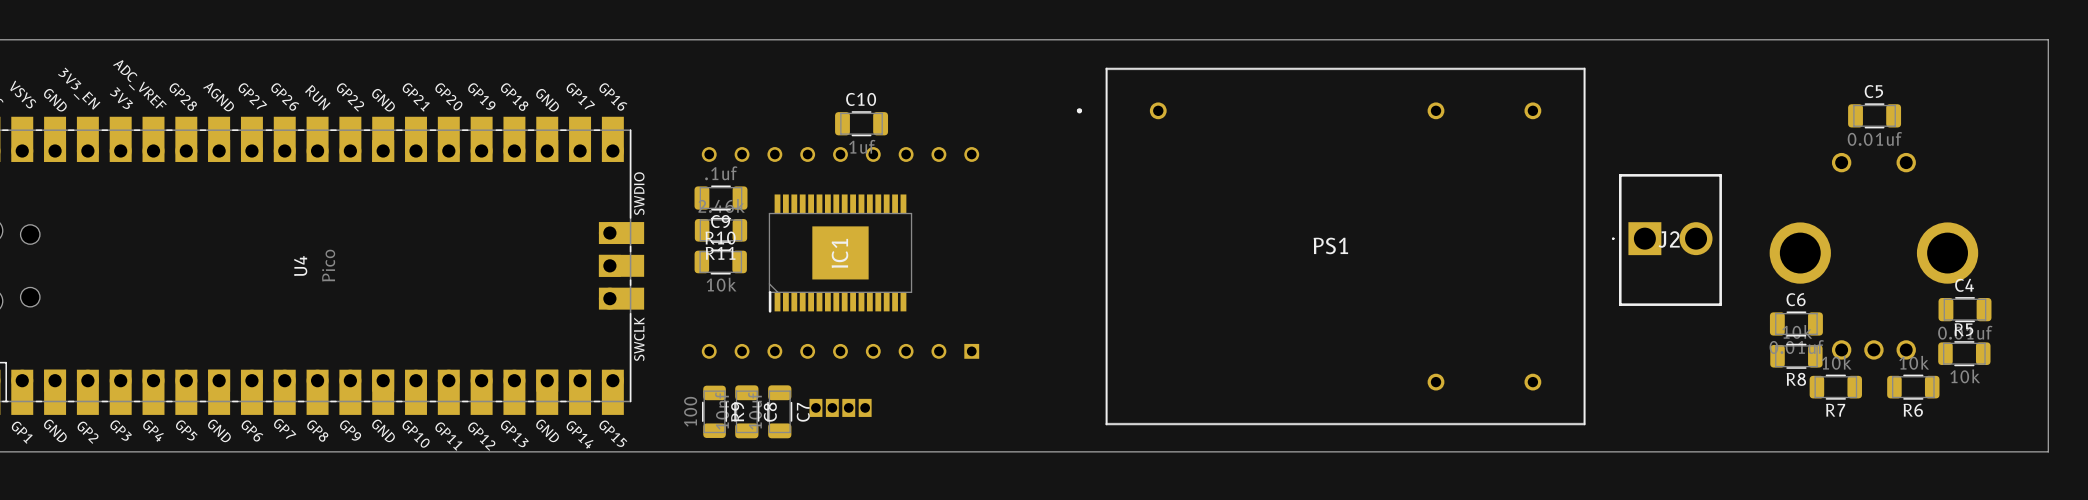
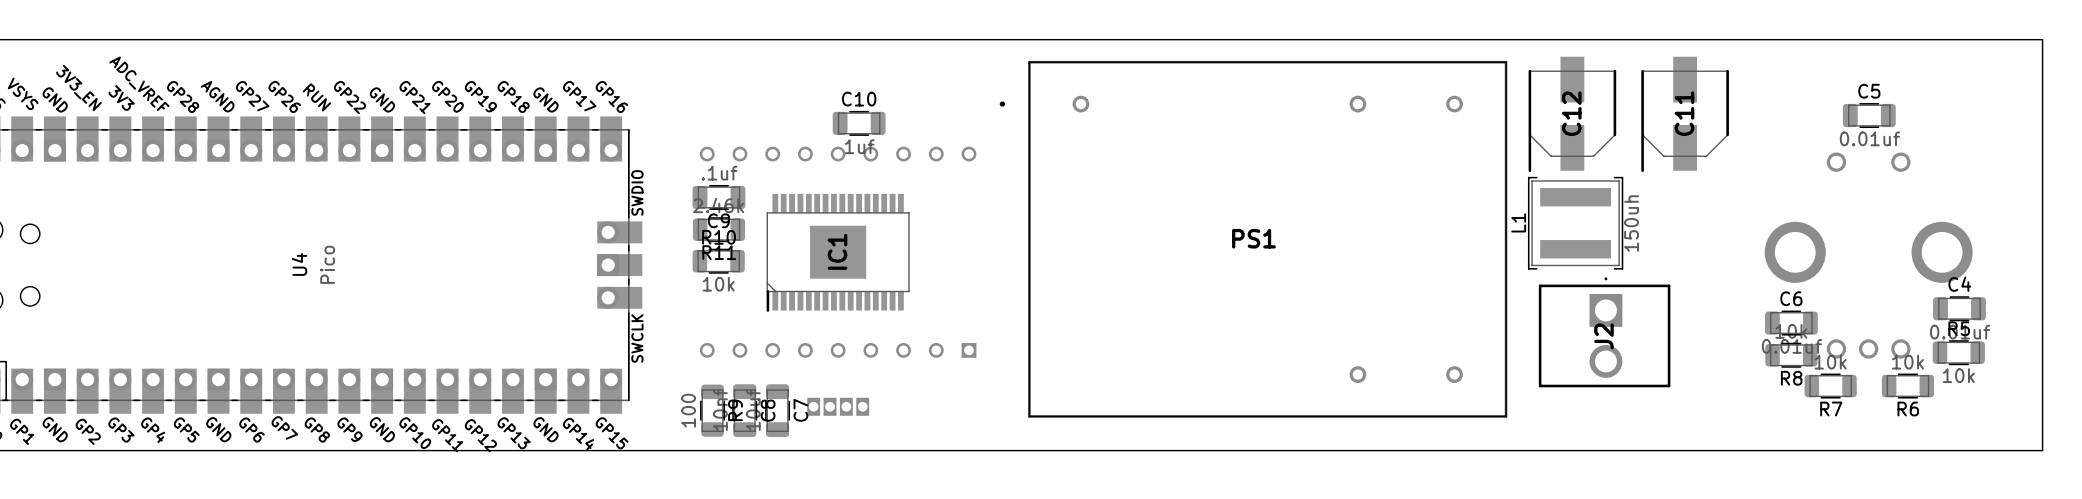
C12: none -> (1572, 114)
C11: none -> (1685, 114)
L1: none -> 150uh (1575, 223)
J2 rotation: 0° (1666, 240) -> 90° clockwise (1604, 332)
J2 position: (1666, 240) -> (1604, 332)
PS1 position: (1331, 246) -> (1253, 239)

